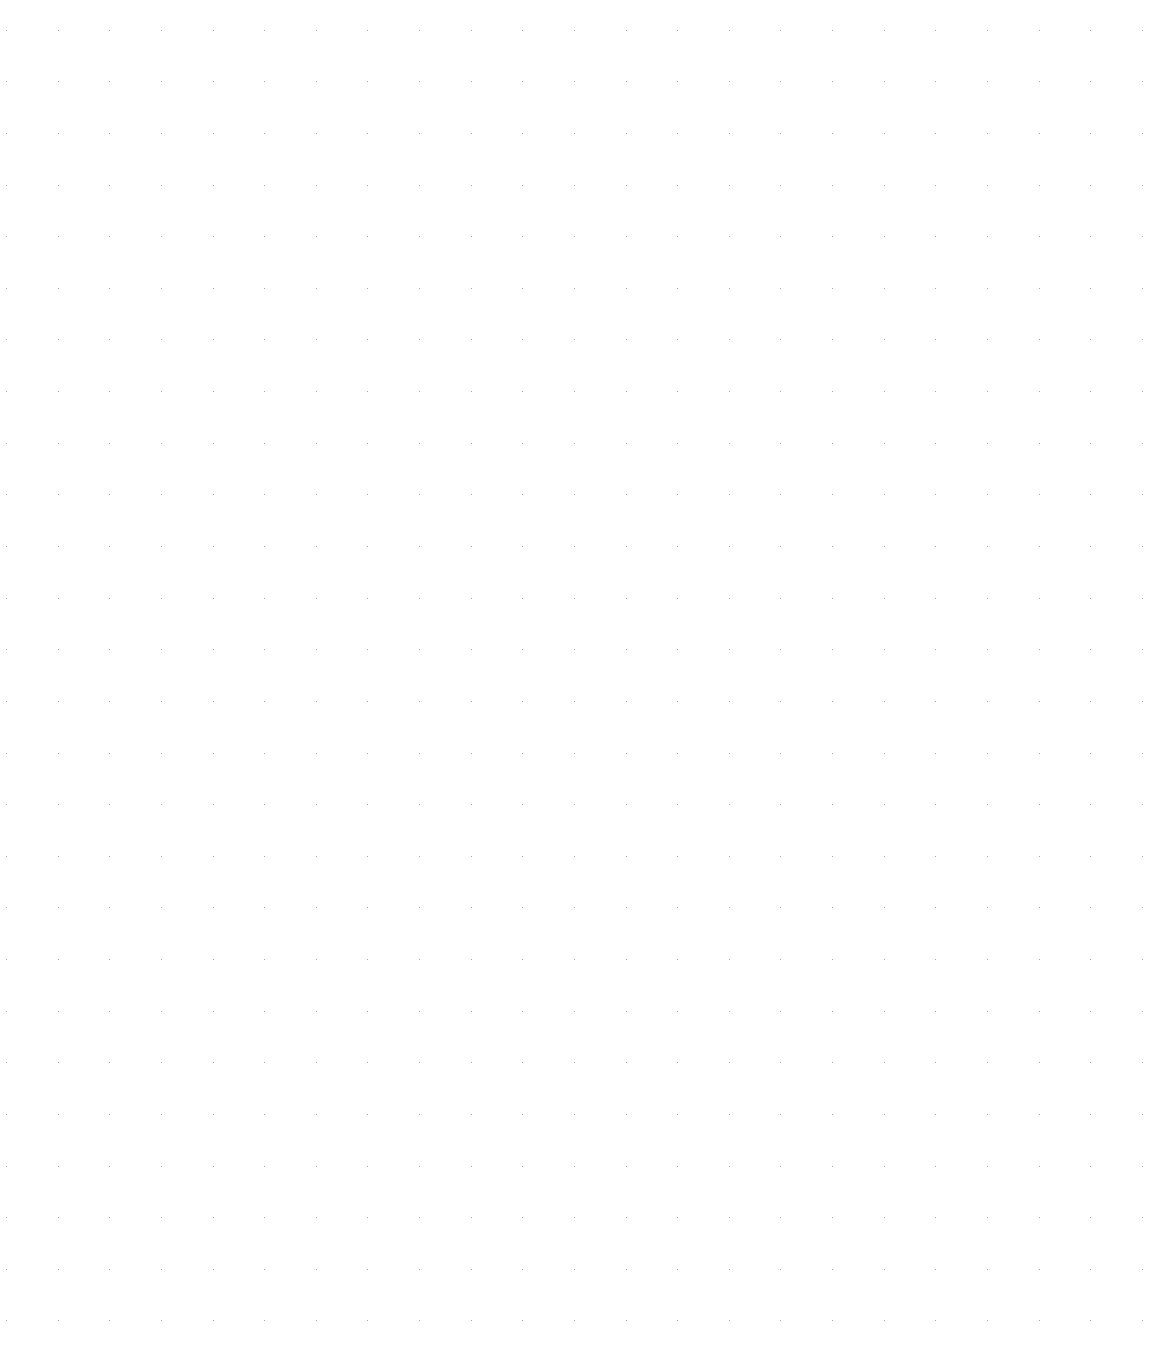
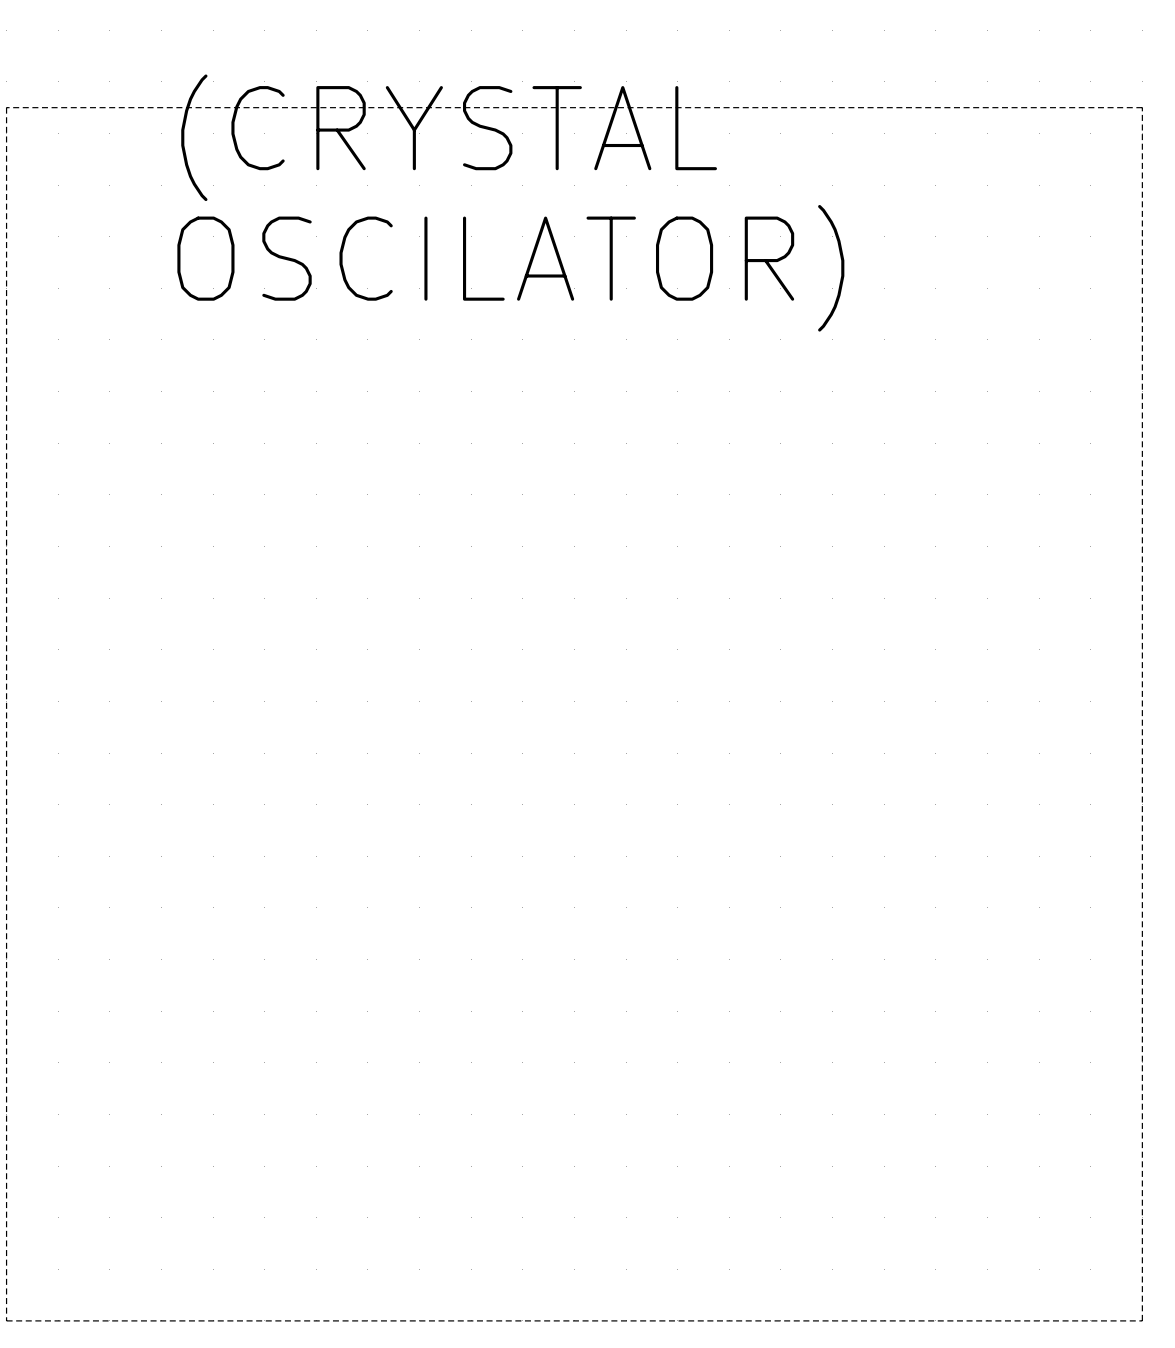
line: none -> (6, 107) (6, 1320) (1142, 1320) (1142, 107) (6, 107)
text: none -> (CRYSTAL (449, 137)
text: none -> OSCILATOR) (510, 268)

